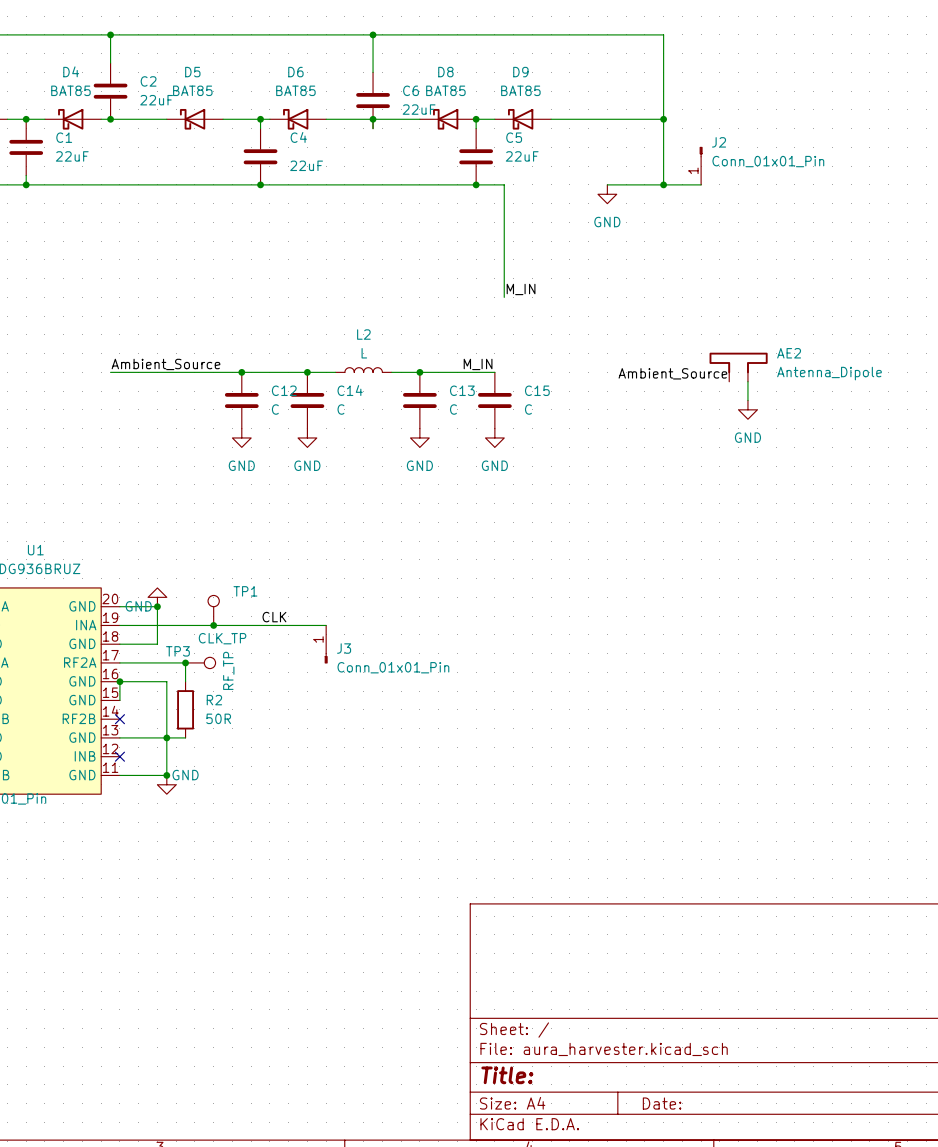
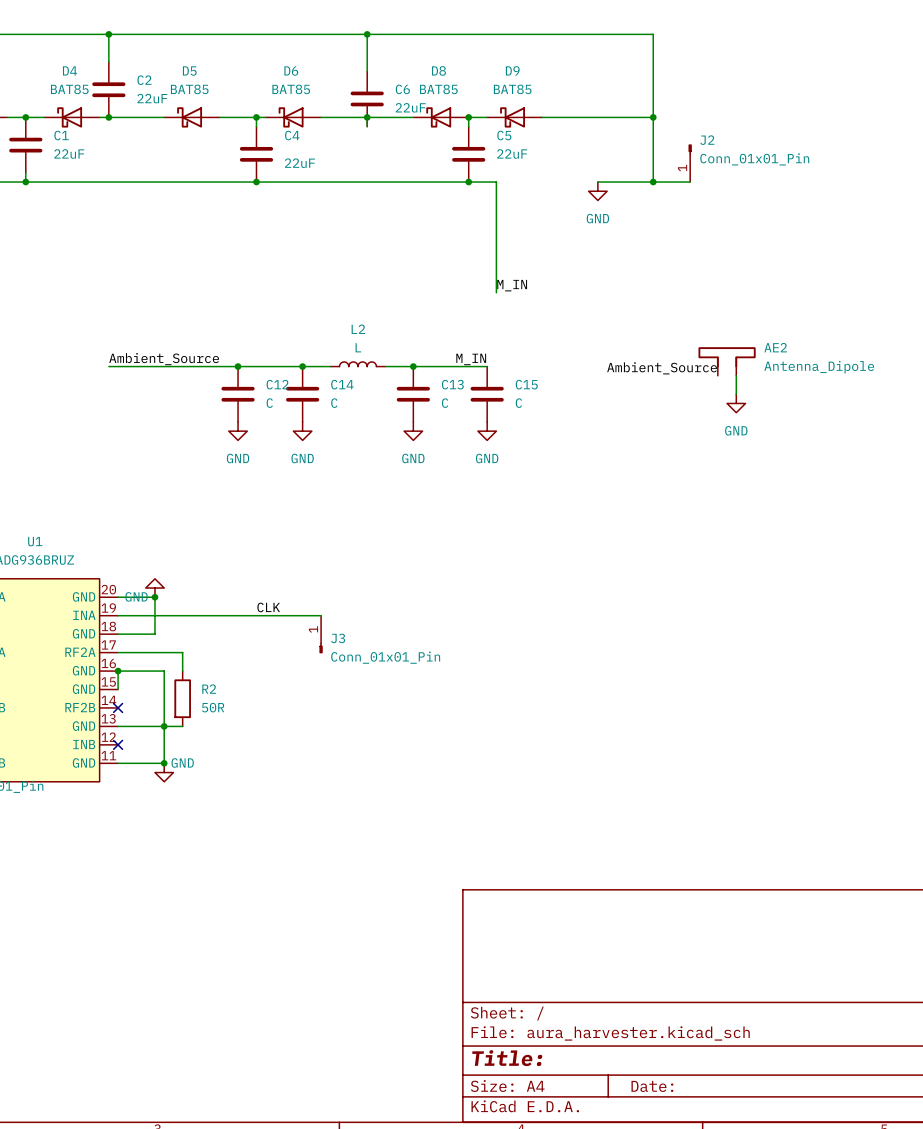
TP1: CLK_TP (213, 610) -> none
junction: (213, 625) -> none
junction: (185, 662) -> none
TP3: RF_TP (200, 662) -> none

